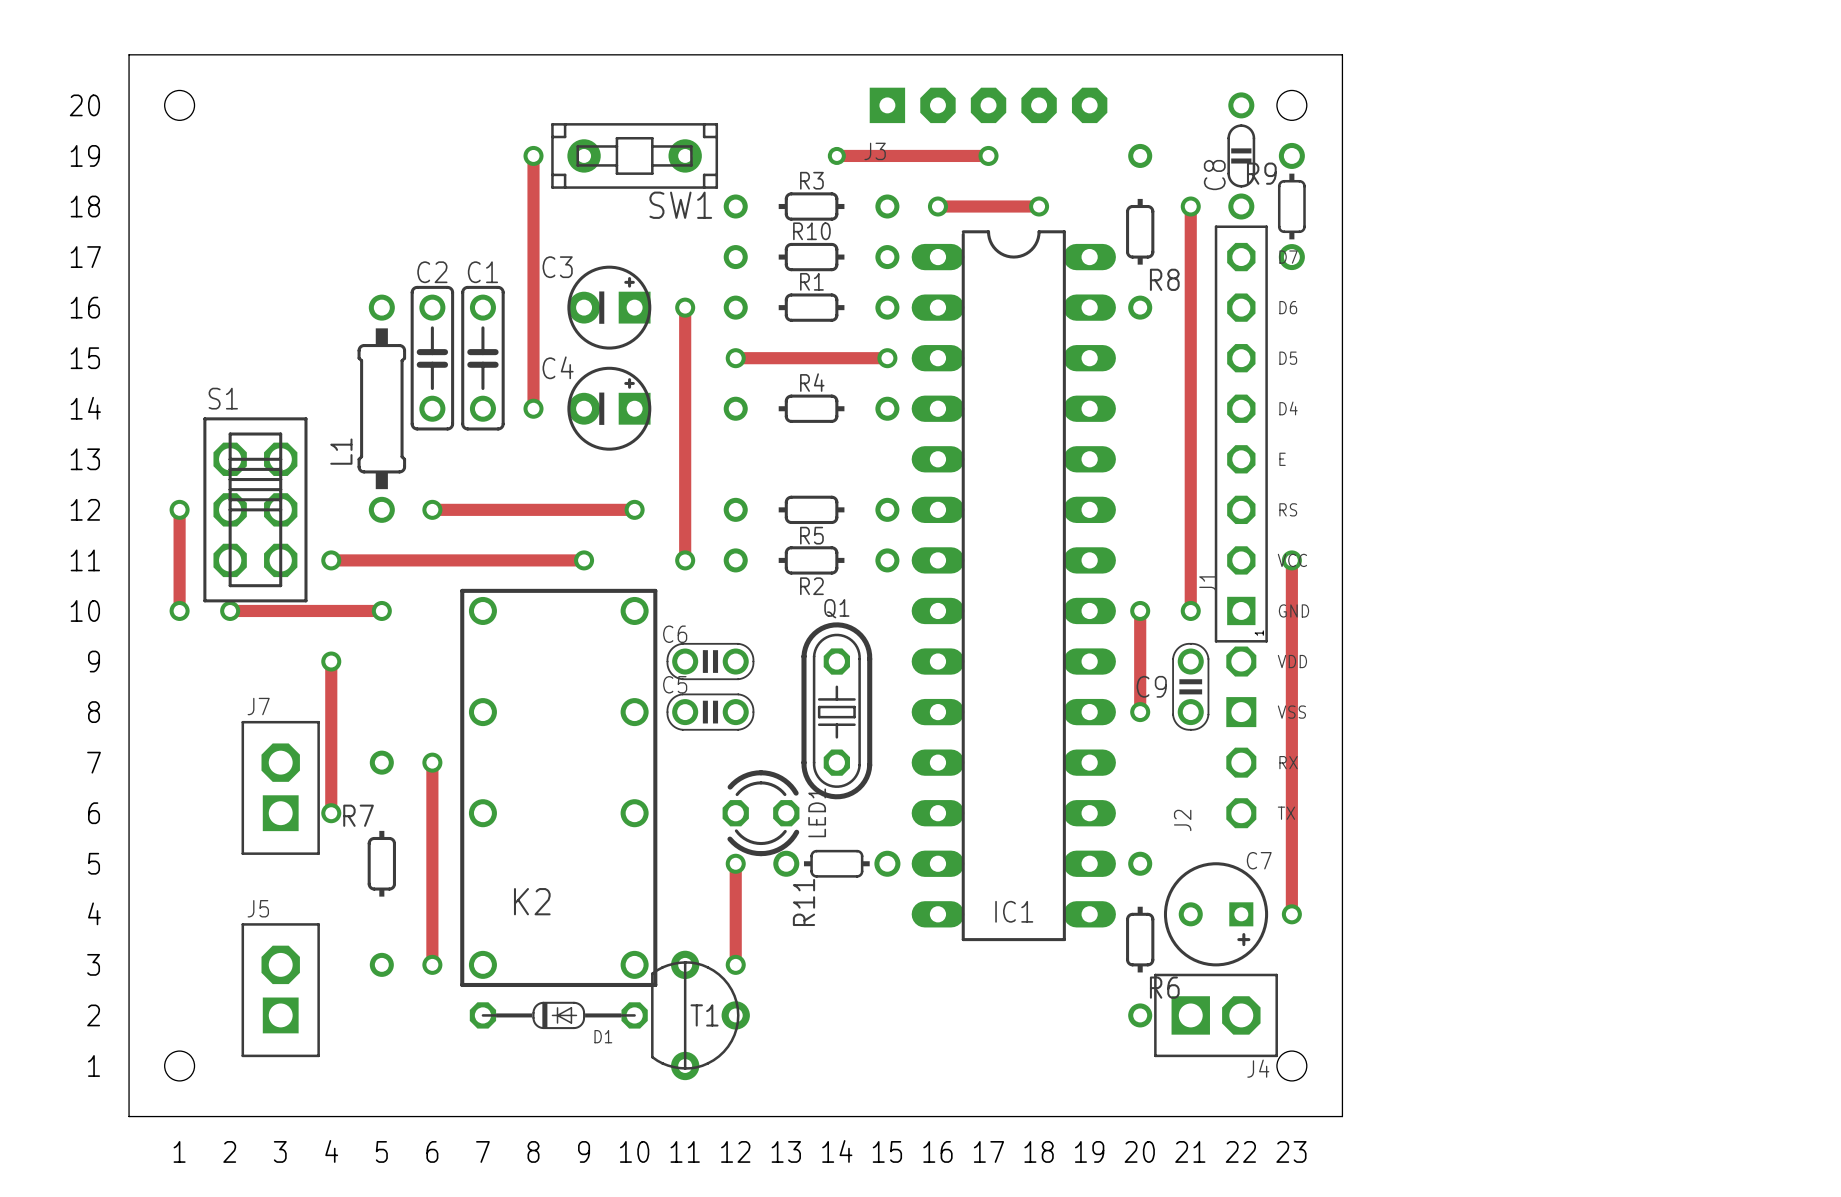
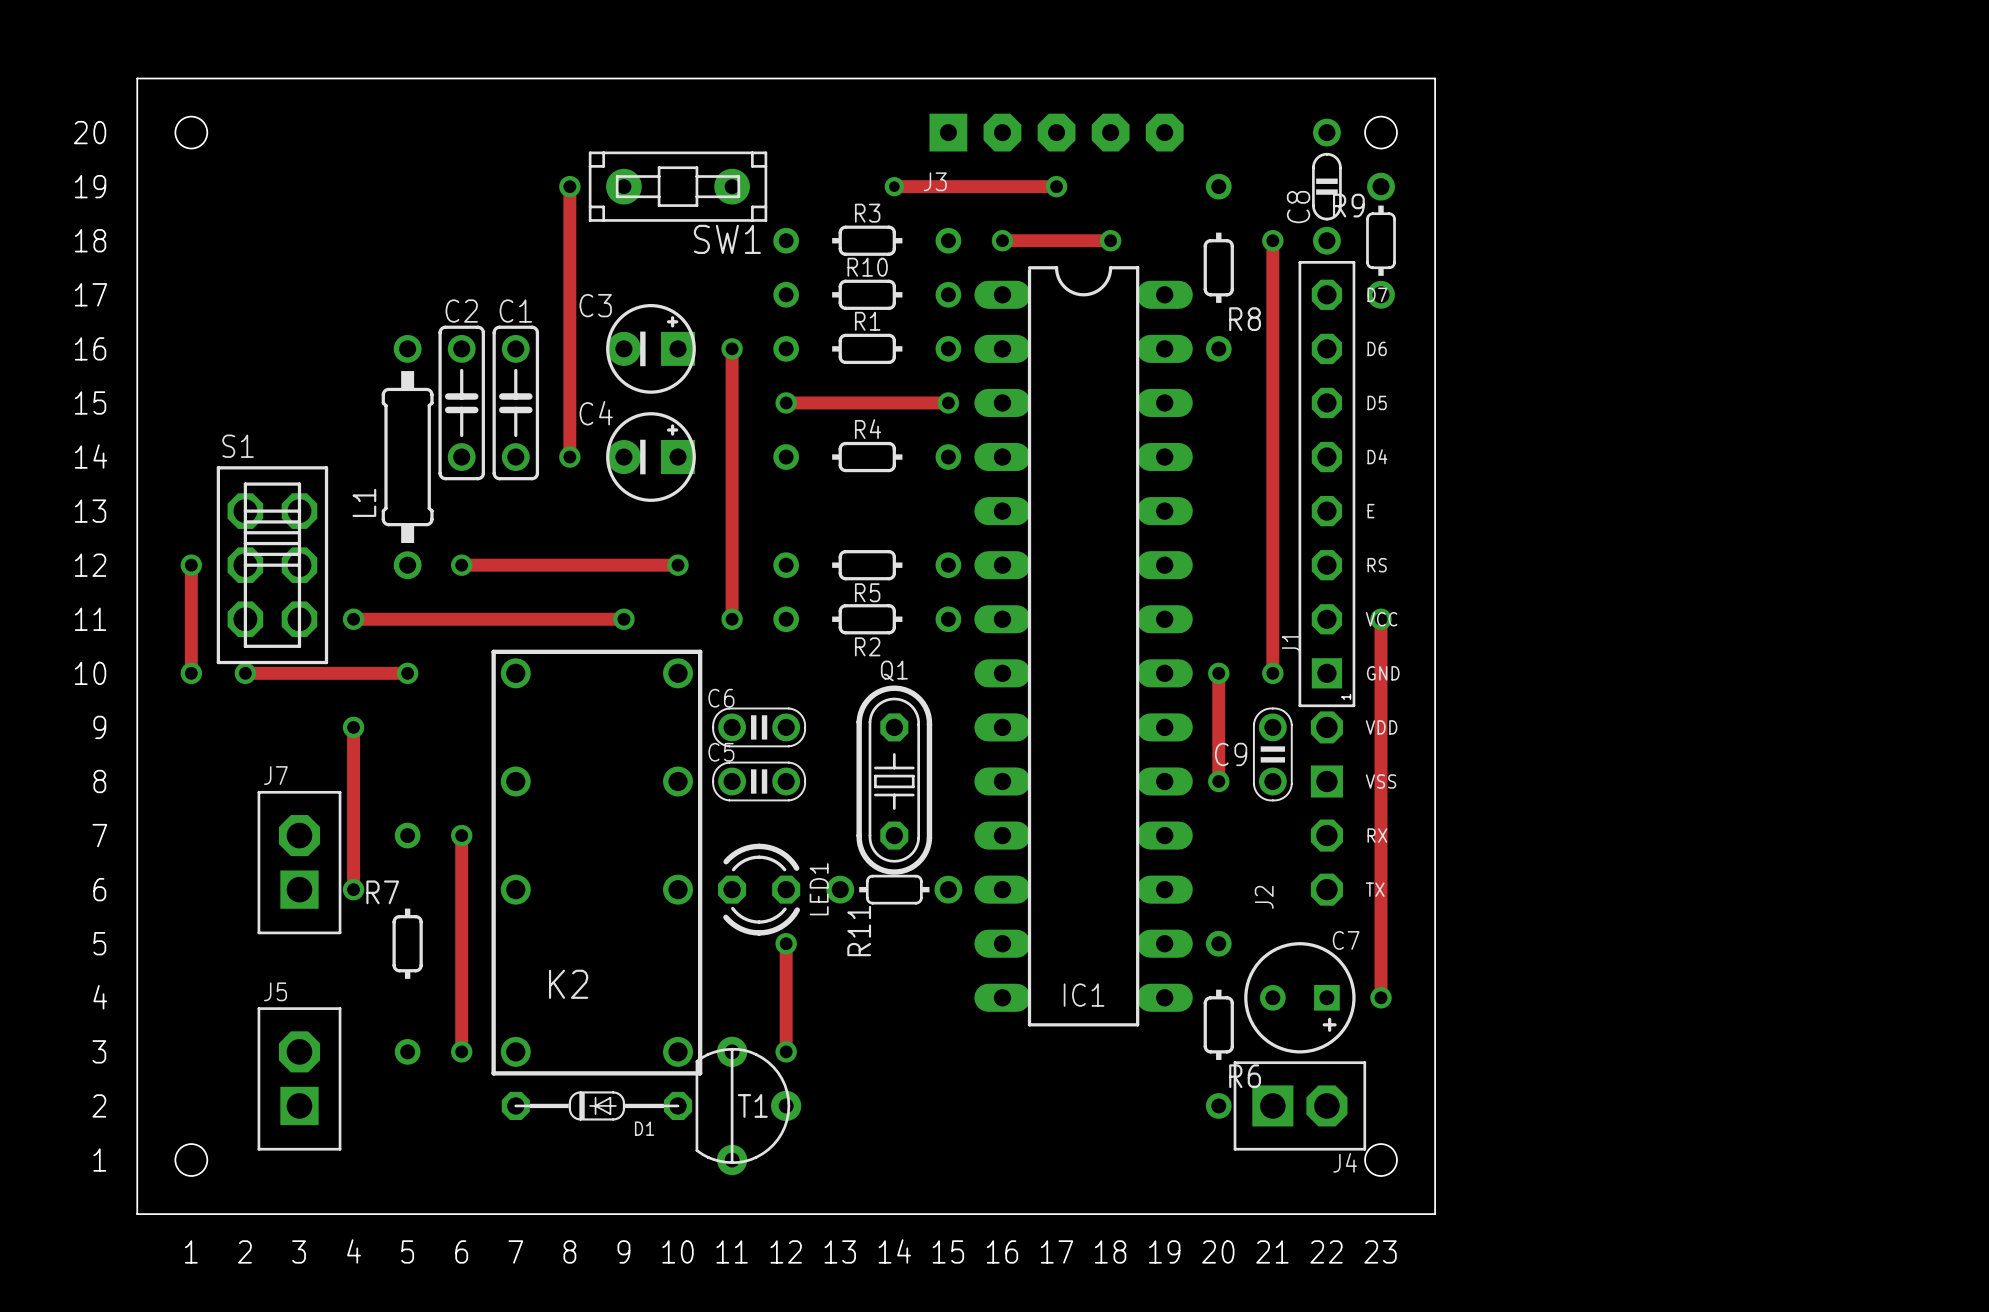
LED1 position: (761, 813) -> (759, 889)
R11 position: (836, 863) -> (894, 889)

